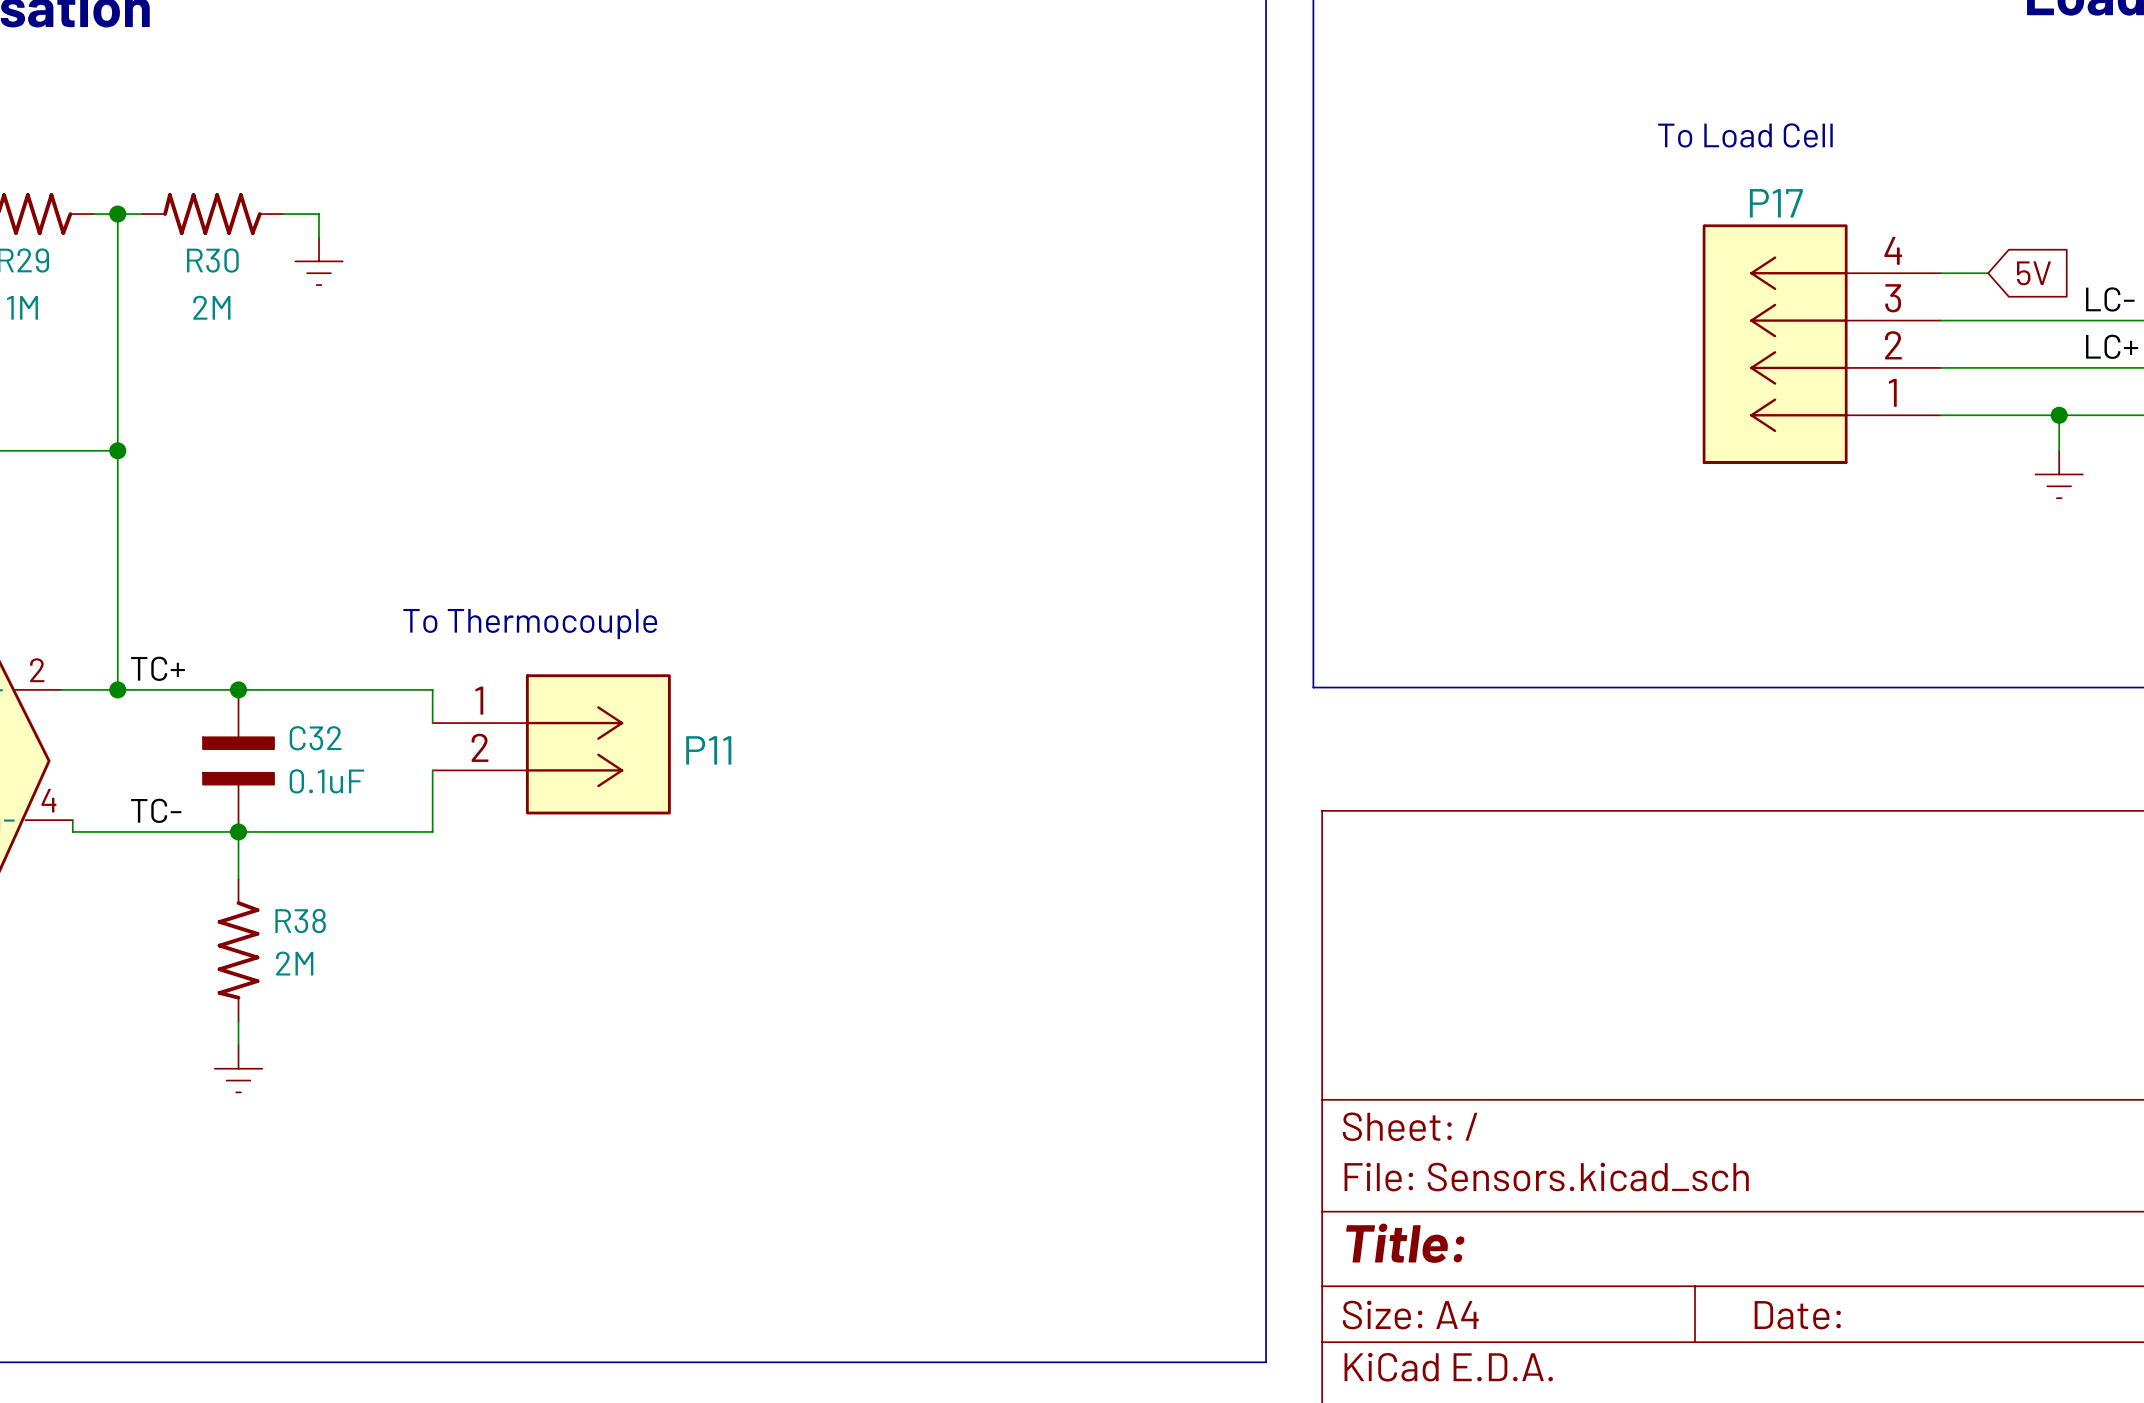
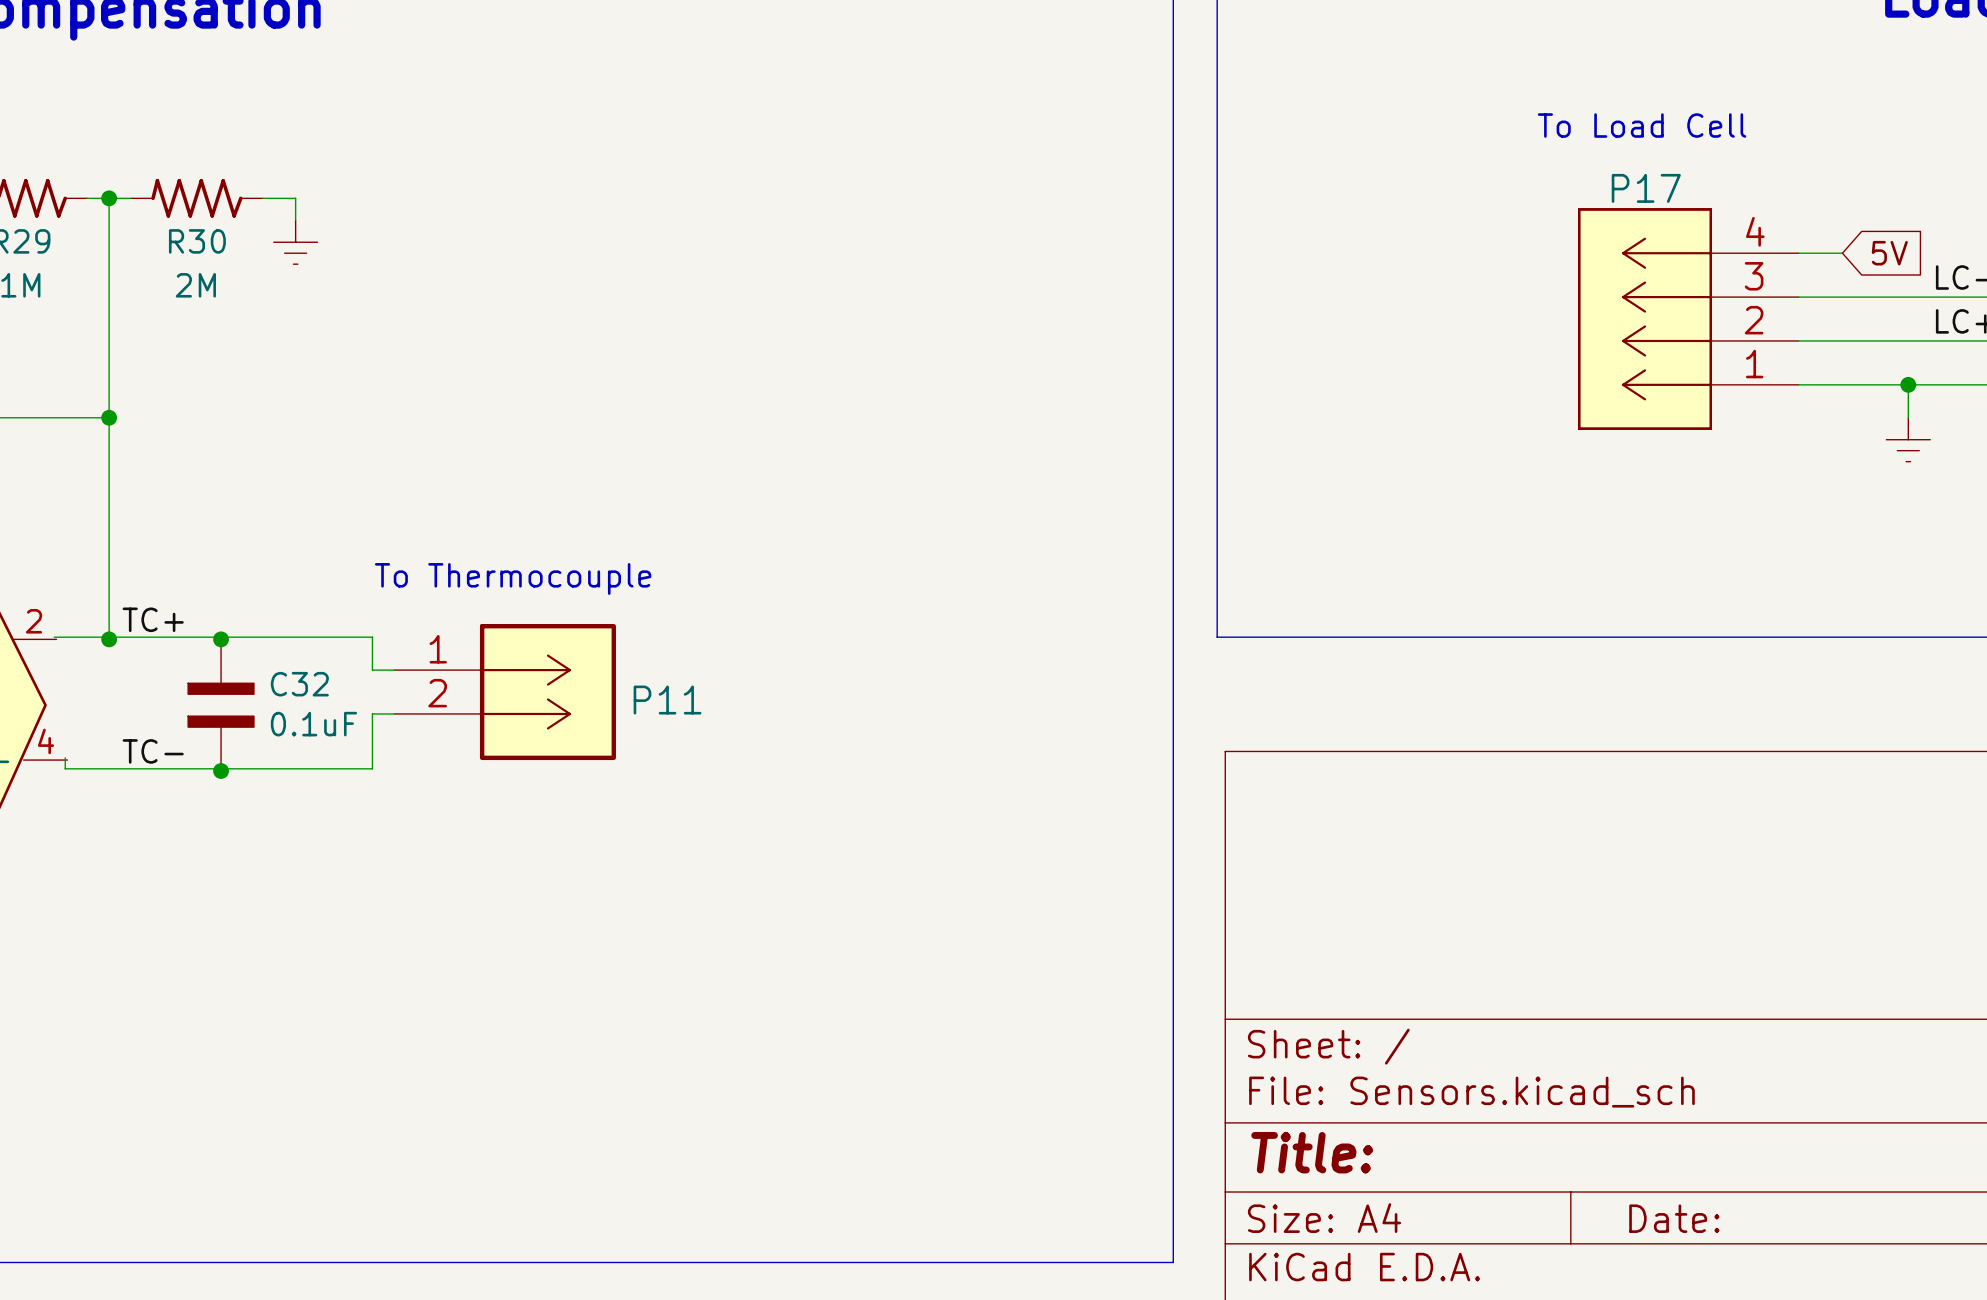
P11 symbol: [432, 674, 671, 815] -> [394, 624, 616, 761]
wire: none -> (54, 637) (372, 637) (372, 670) (394, 670)
wire: (60, 689) (432, 689) (432, 723) -> none
wire: none -> (394, 713) (372, 713) (372, 768) (65, 768) (65, 757)
wire: (432, 770) (432, 831) (72, 831) (72, 820) -> none
wire: (238, 831) (238, 879) -> none
R38: 2M (238, 950) -> none
wire: (238, 1021) (238, 1045) -> none
power symbol: (238, 1068) -> none

